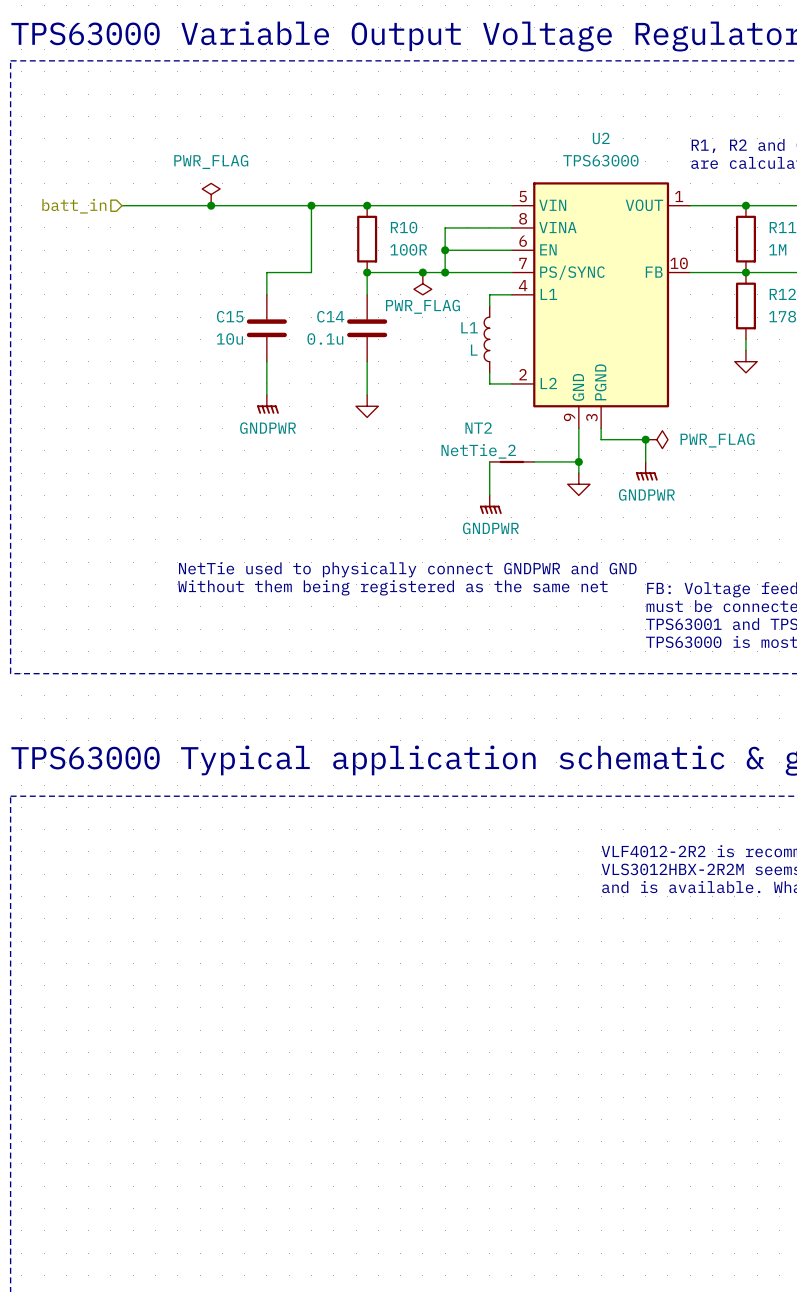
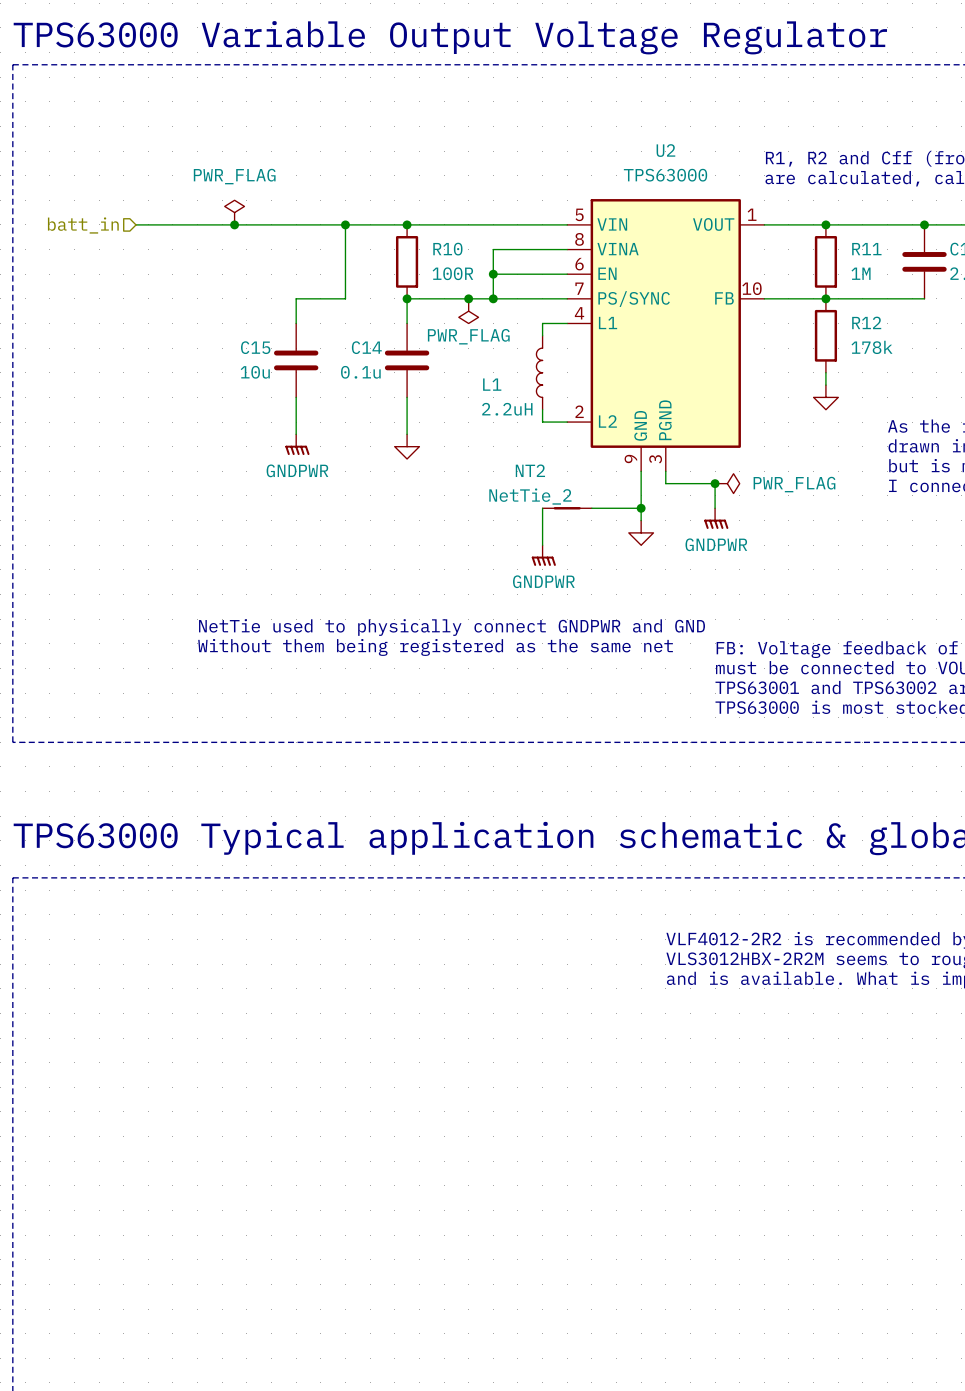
L1 name position: L1 (469, 327) -> L1 (492, 384)
L1 value: L (474, 350) -> 2.2uH (507, 409)

